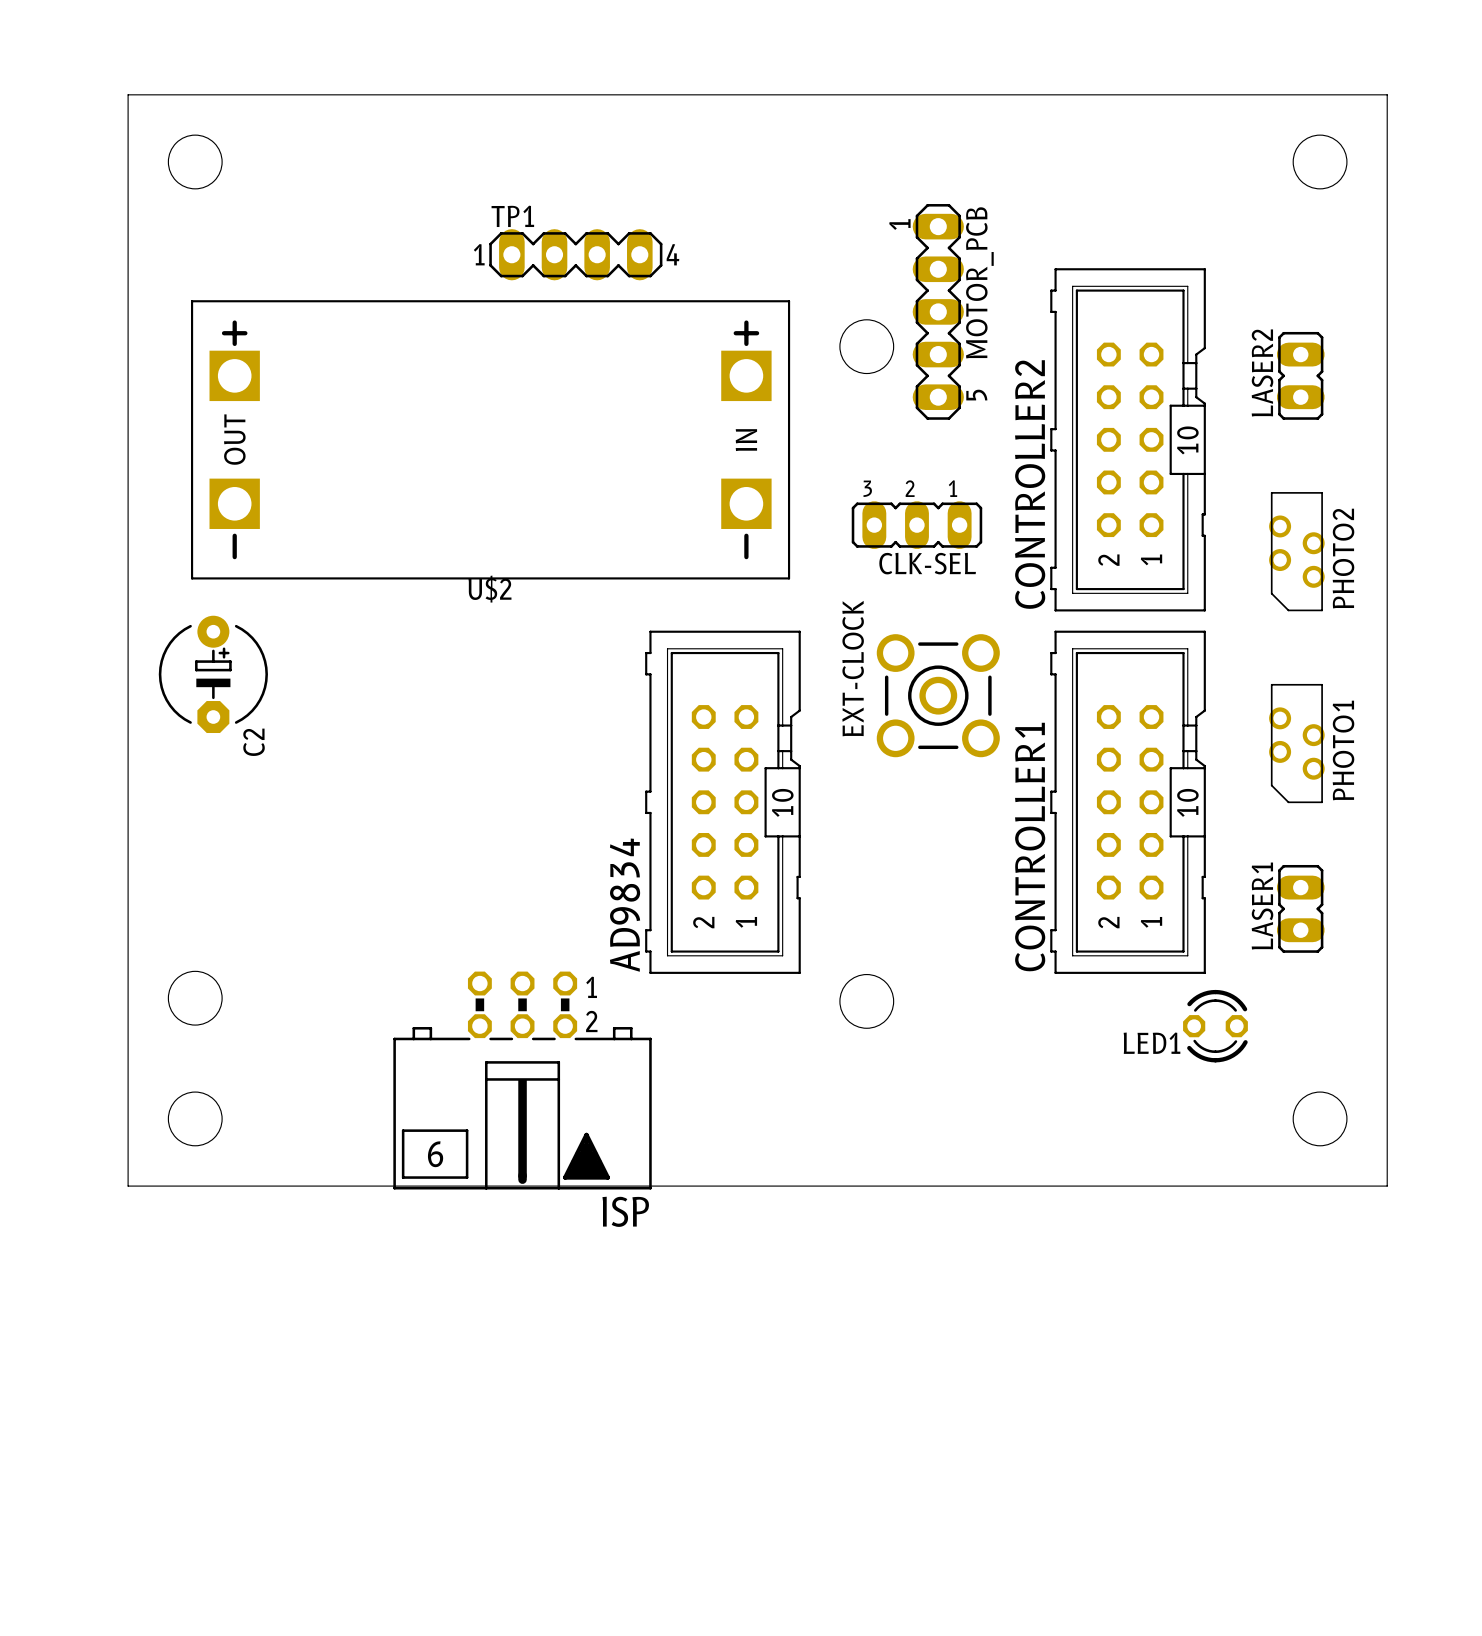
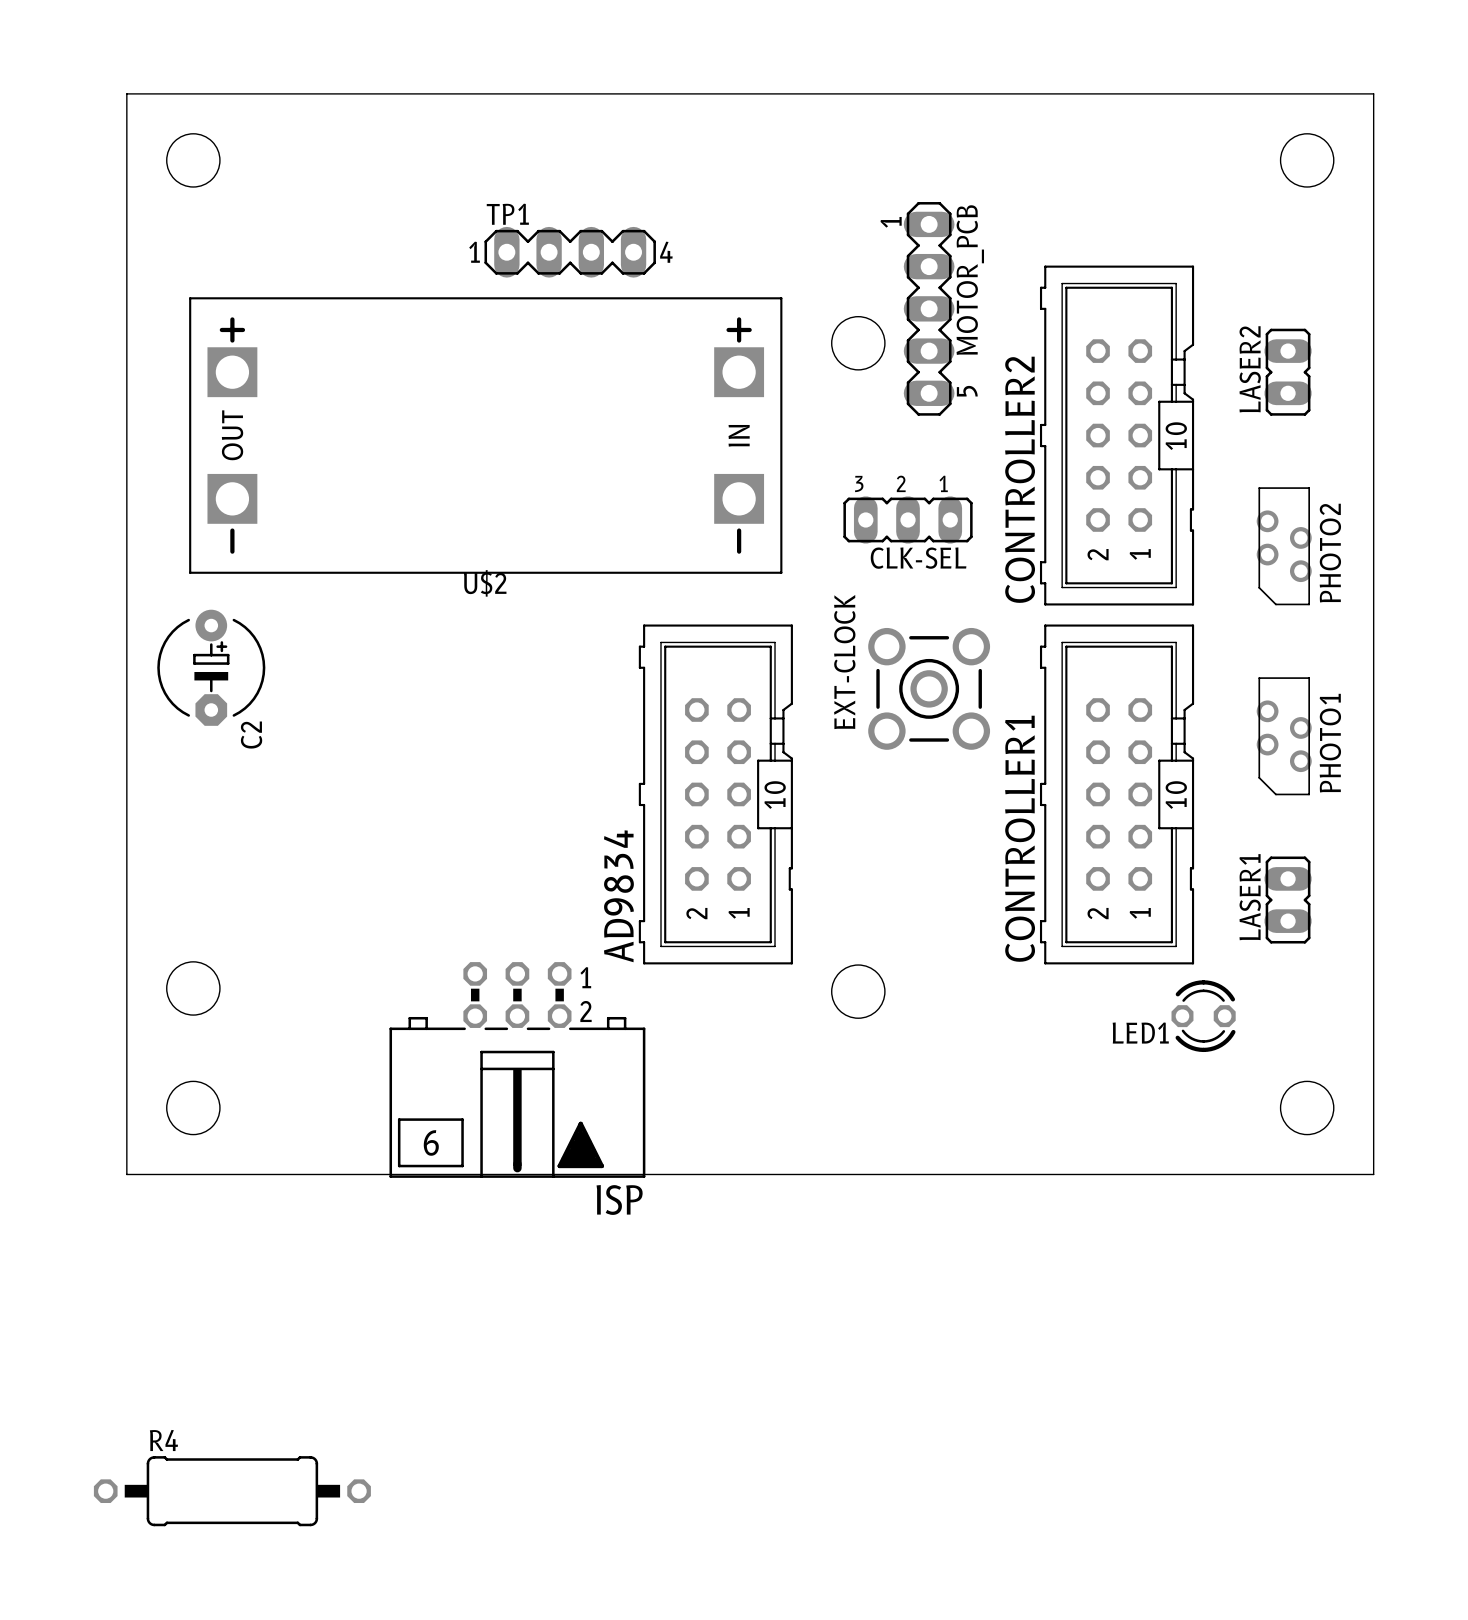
R4: none -> (232, 1491)

